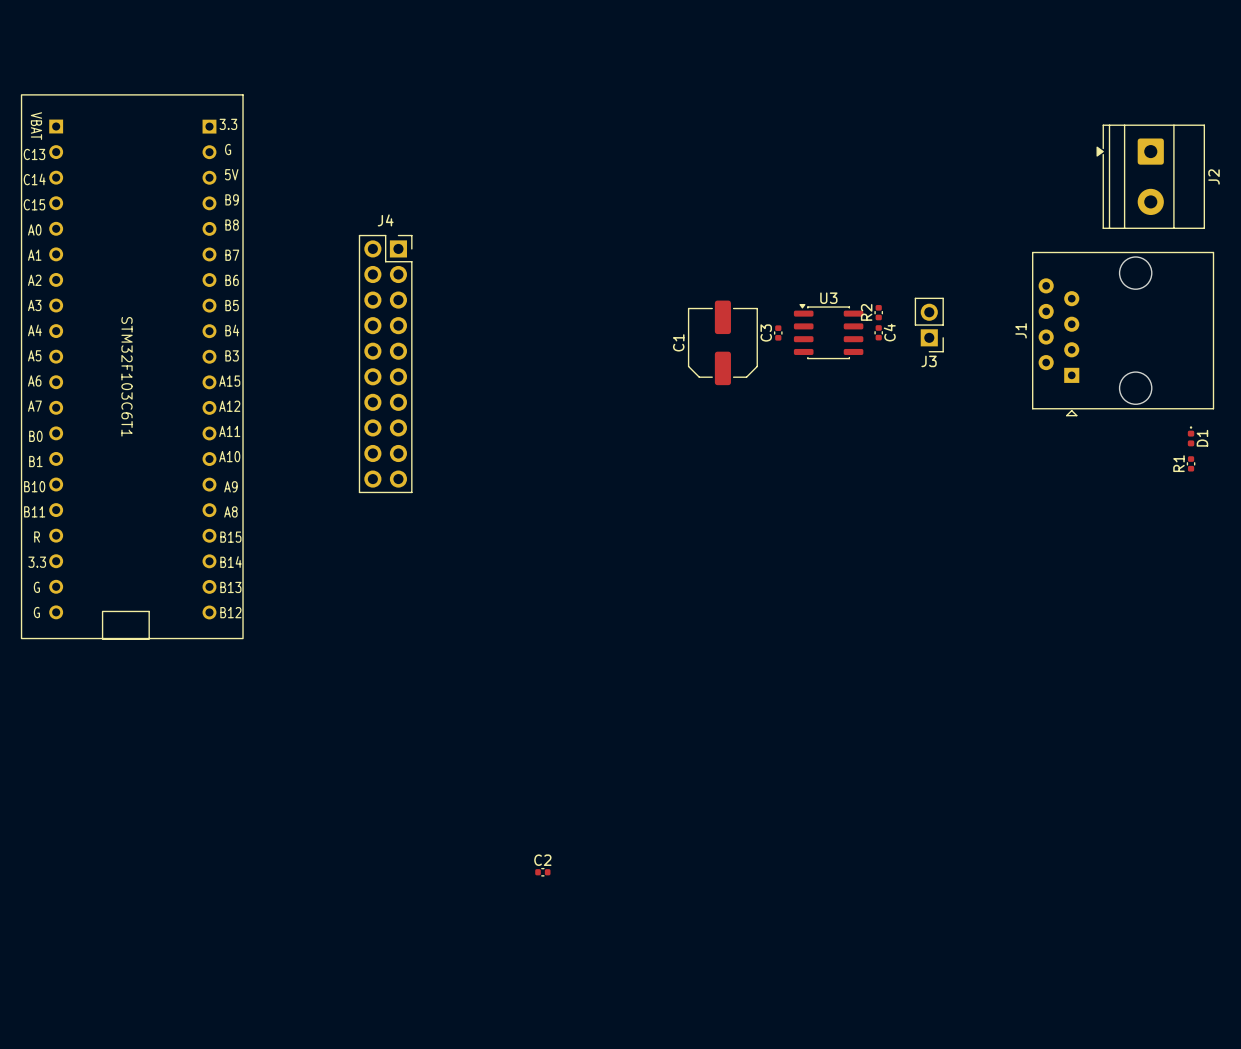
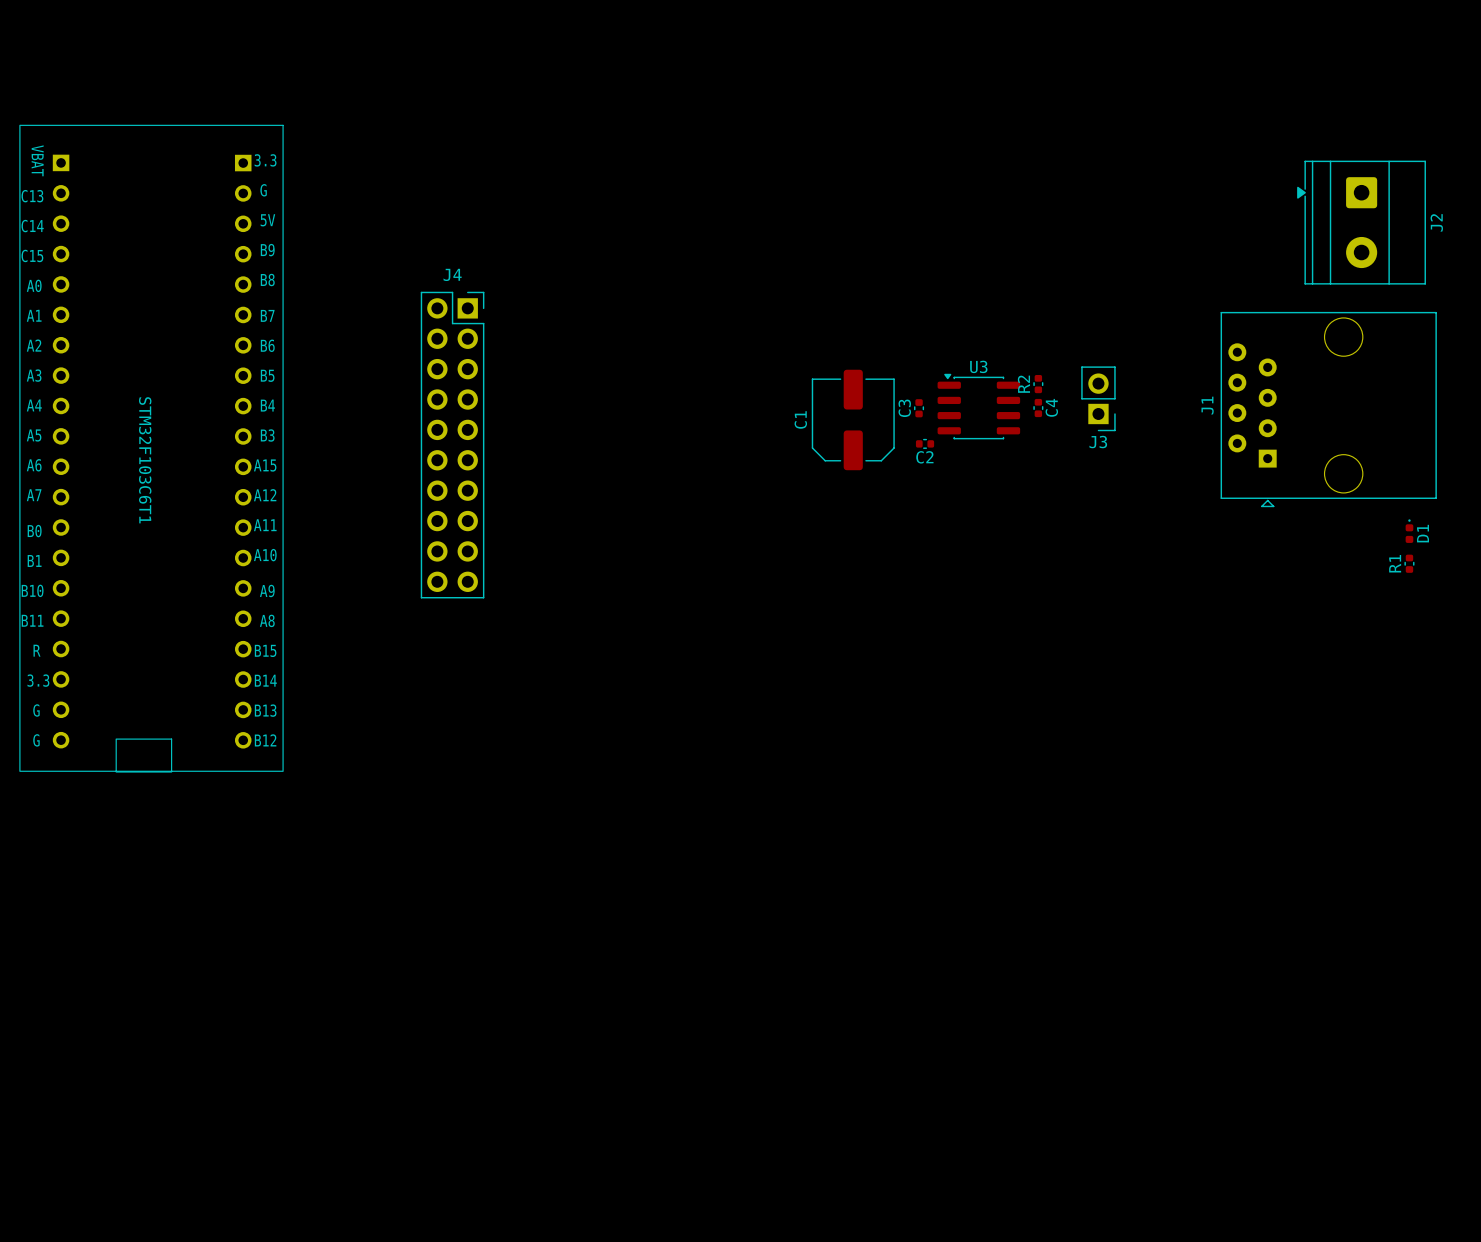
C2 name position: C2 (542, 860) -> C2 (924, 457)
C2 position: (542, 872) -> (925, 443)

